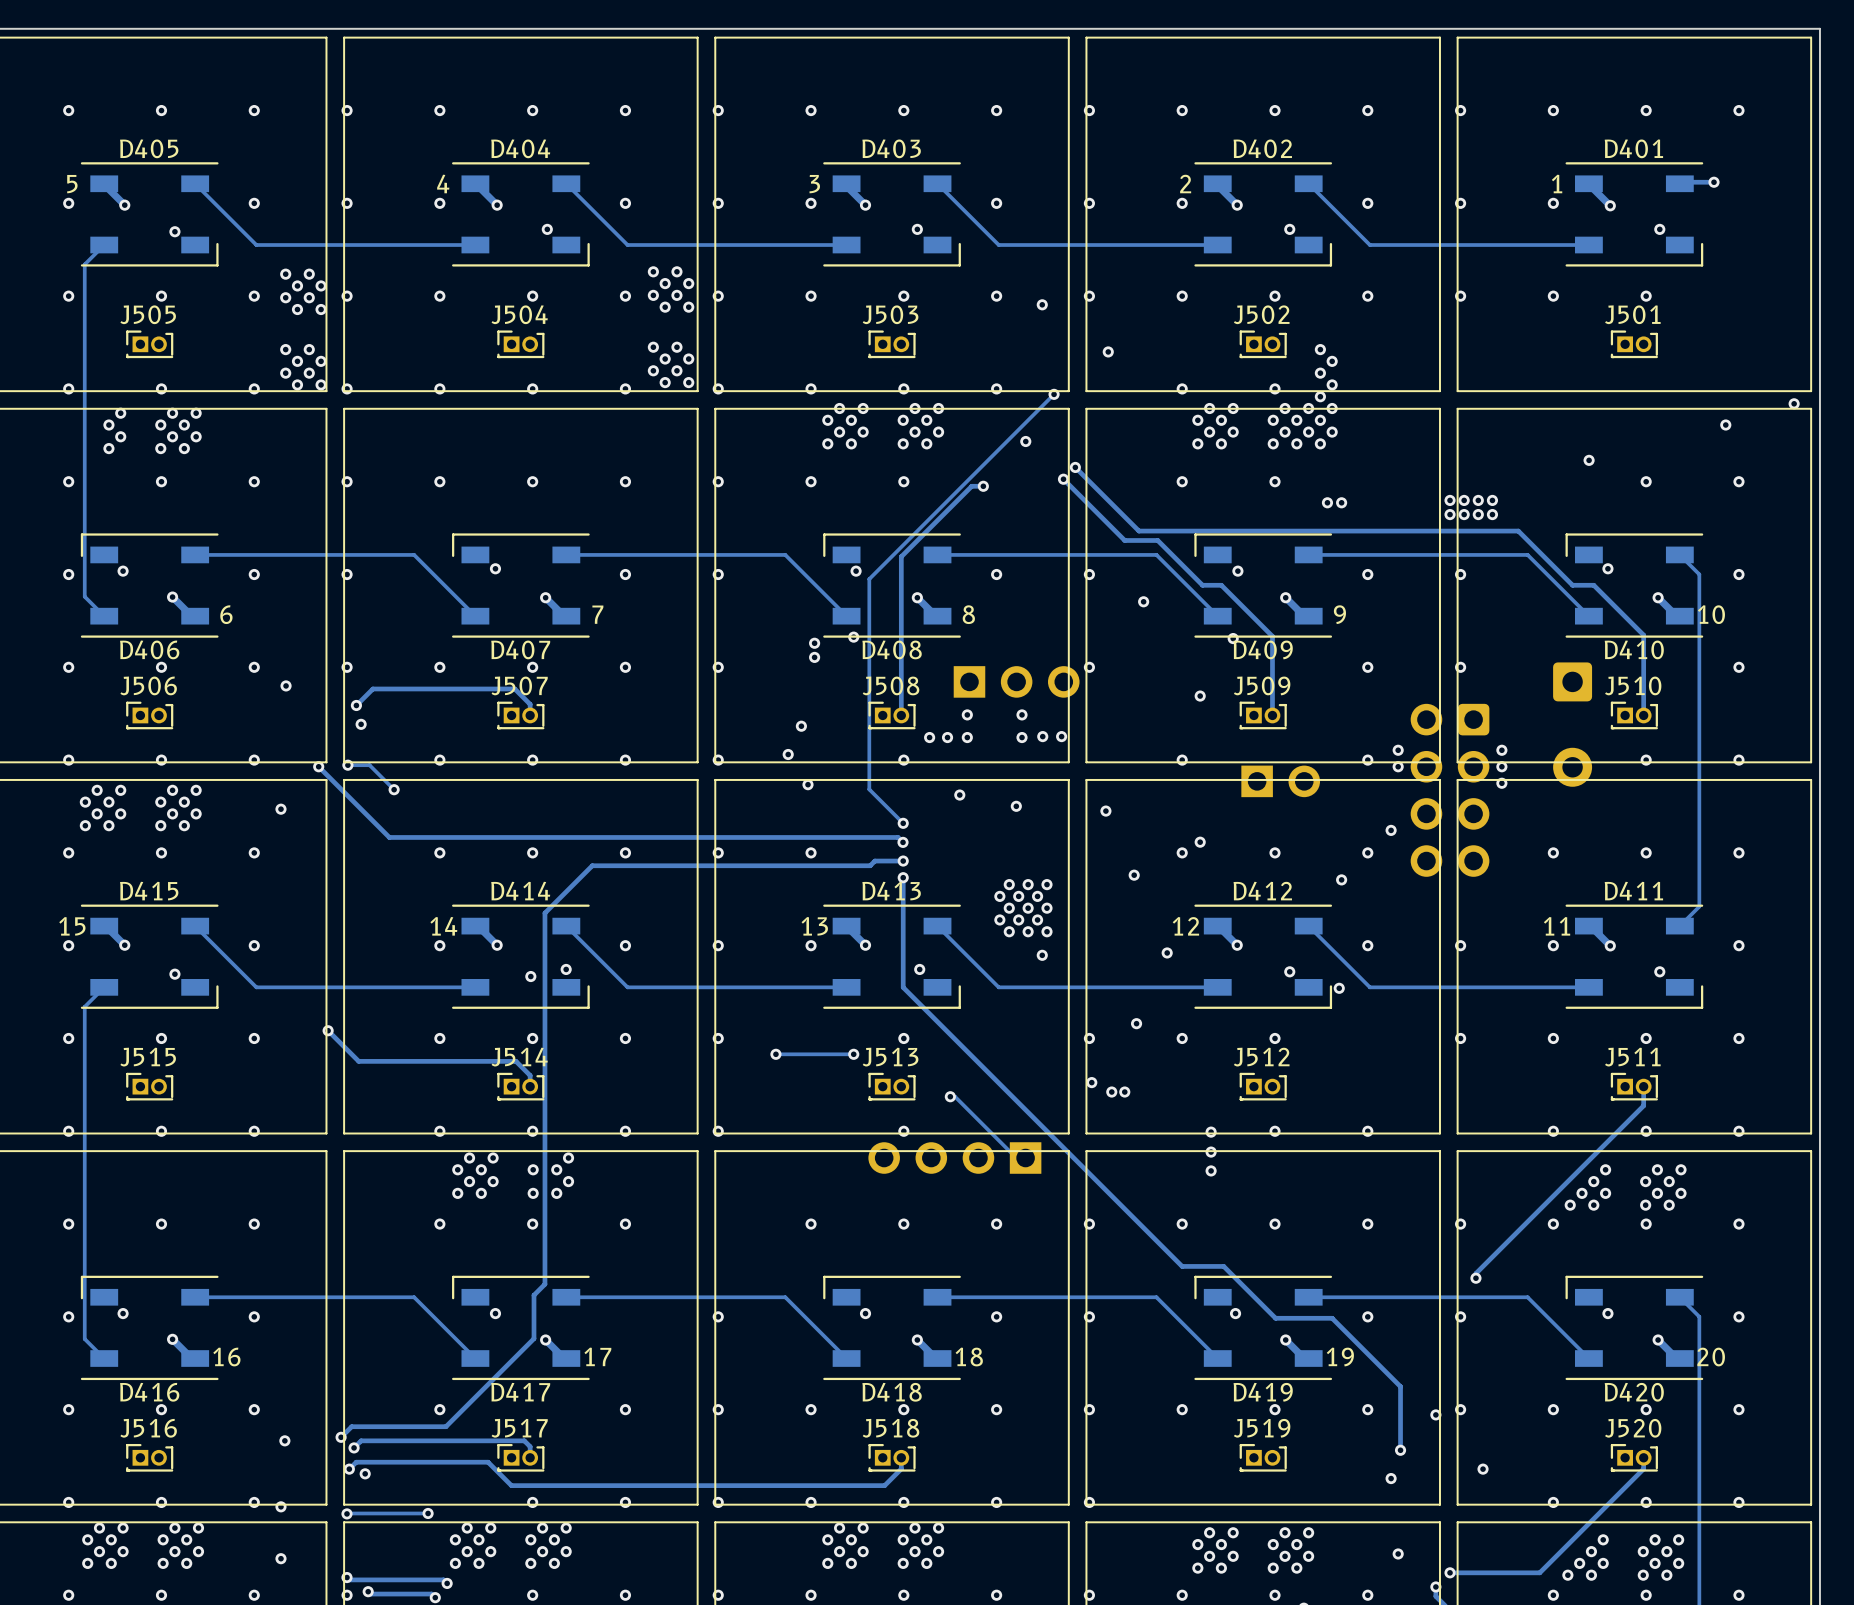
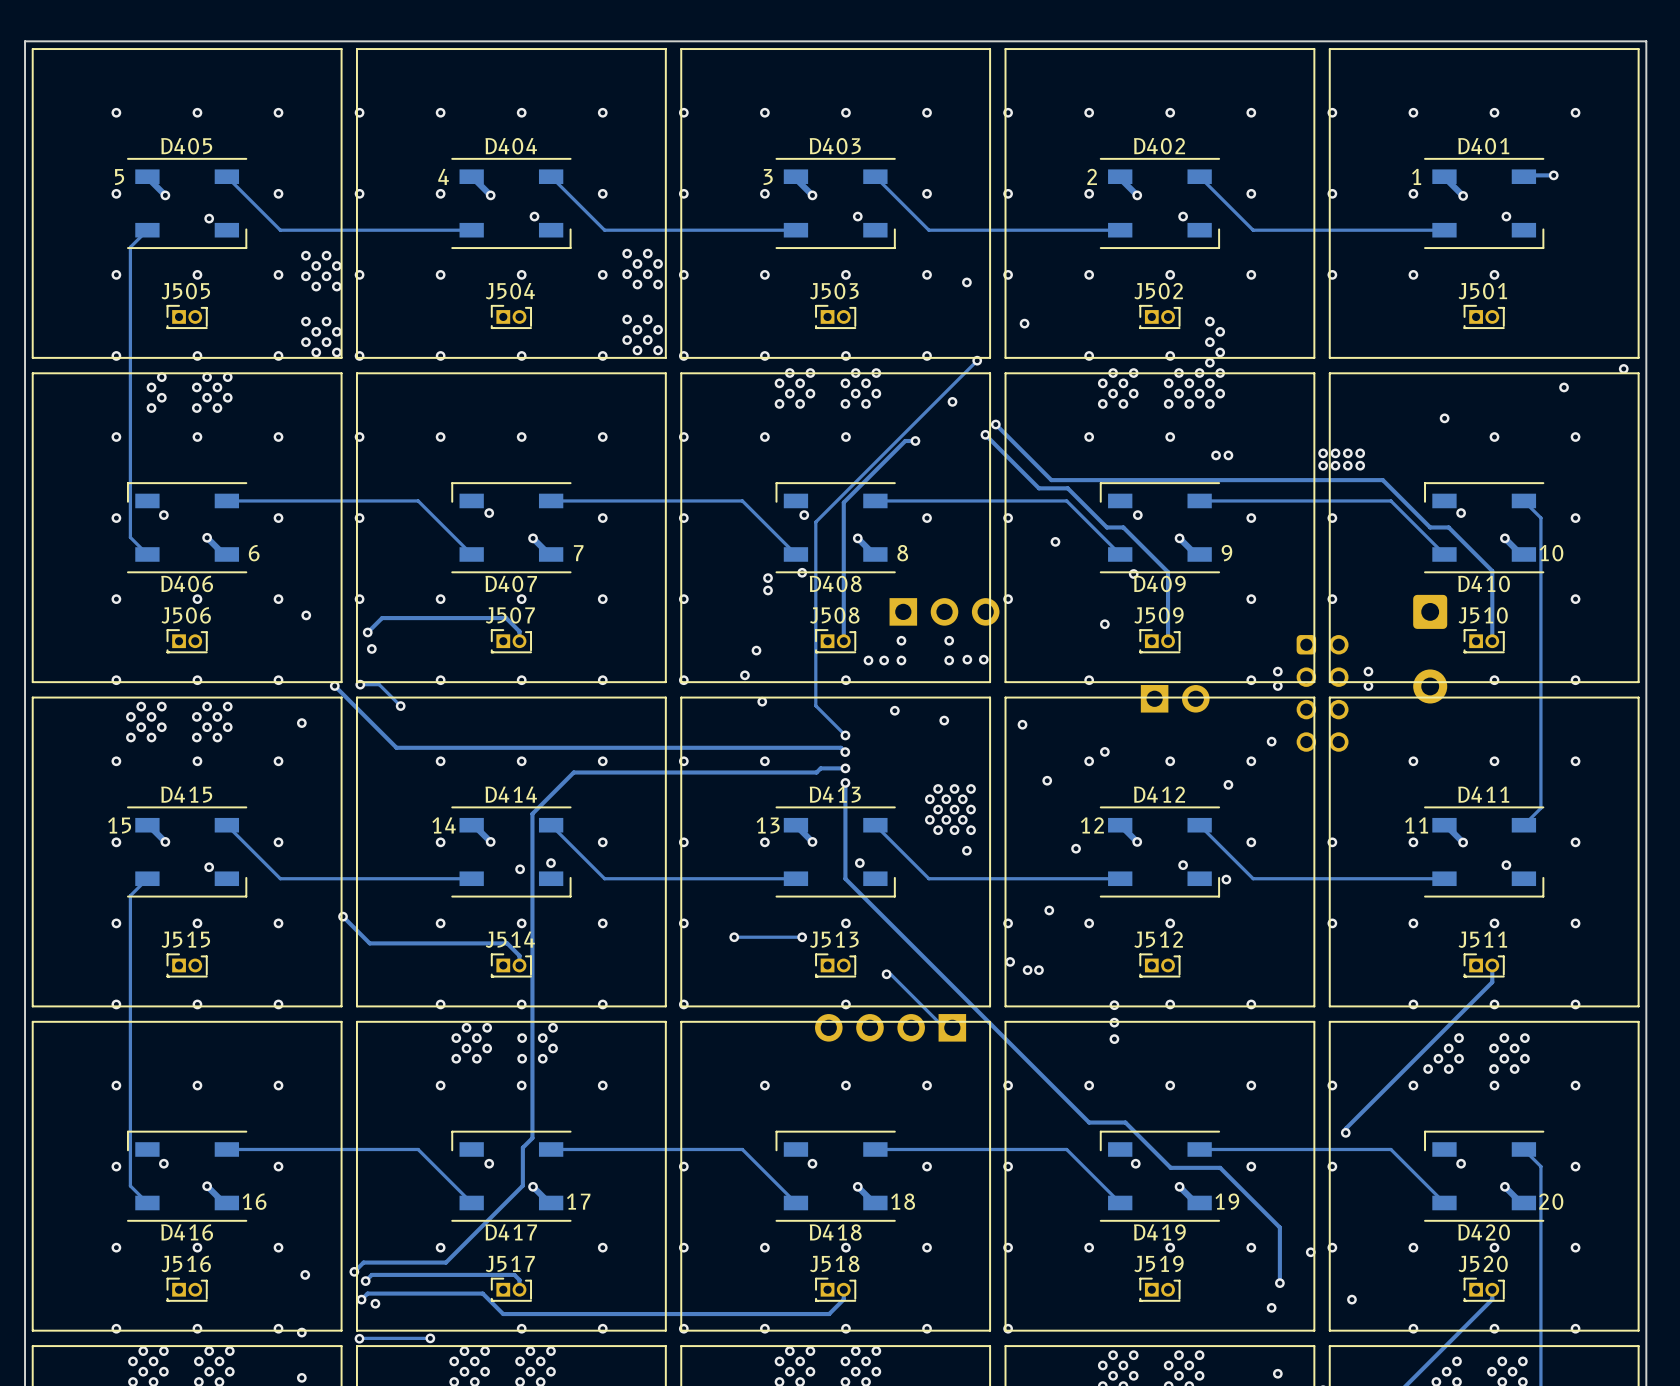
part footprint: [1410, 703, 1490, 877] -> [1296, 635, 1349, 752]
via: (1501, 783) -> none

